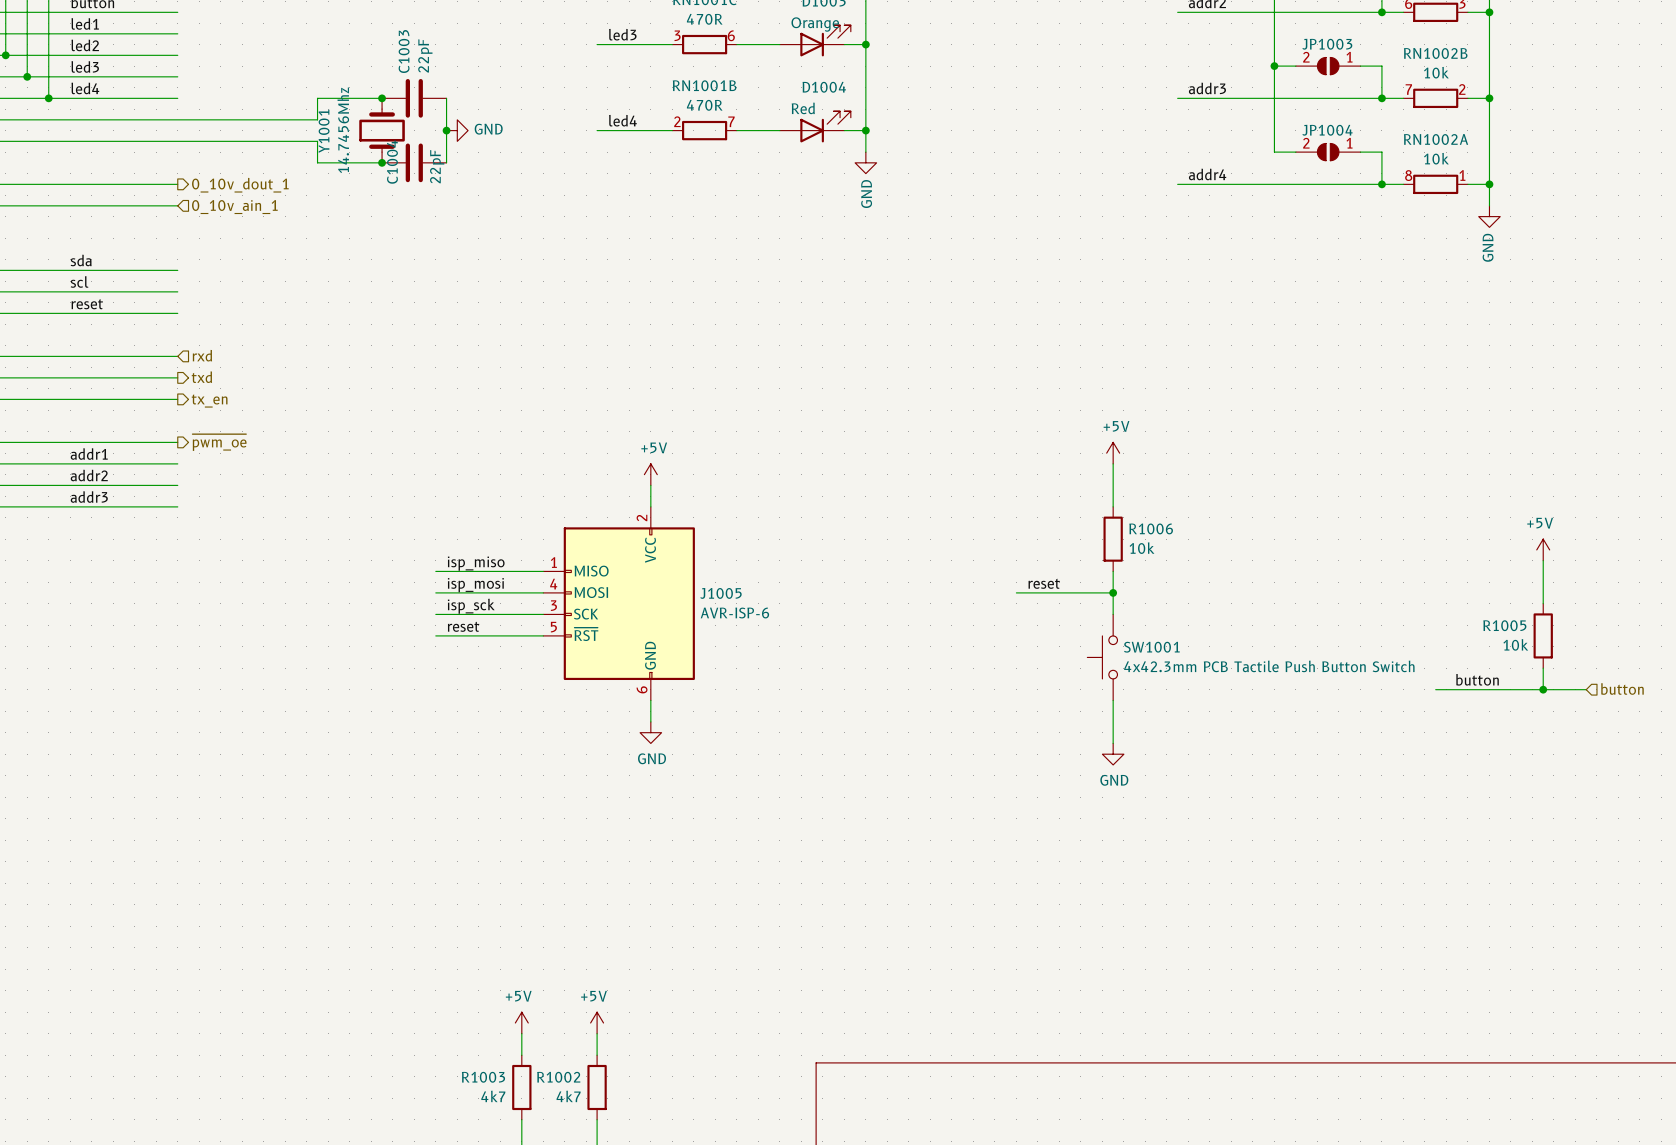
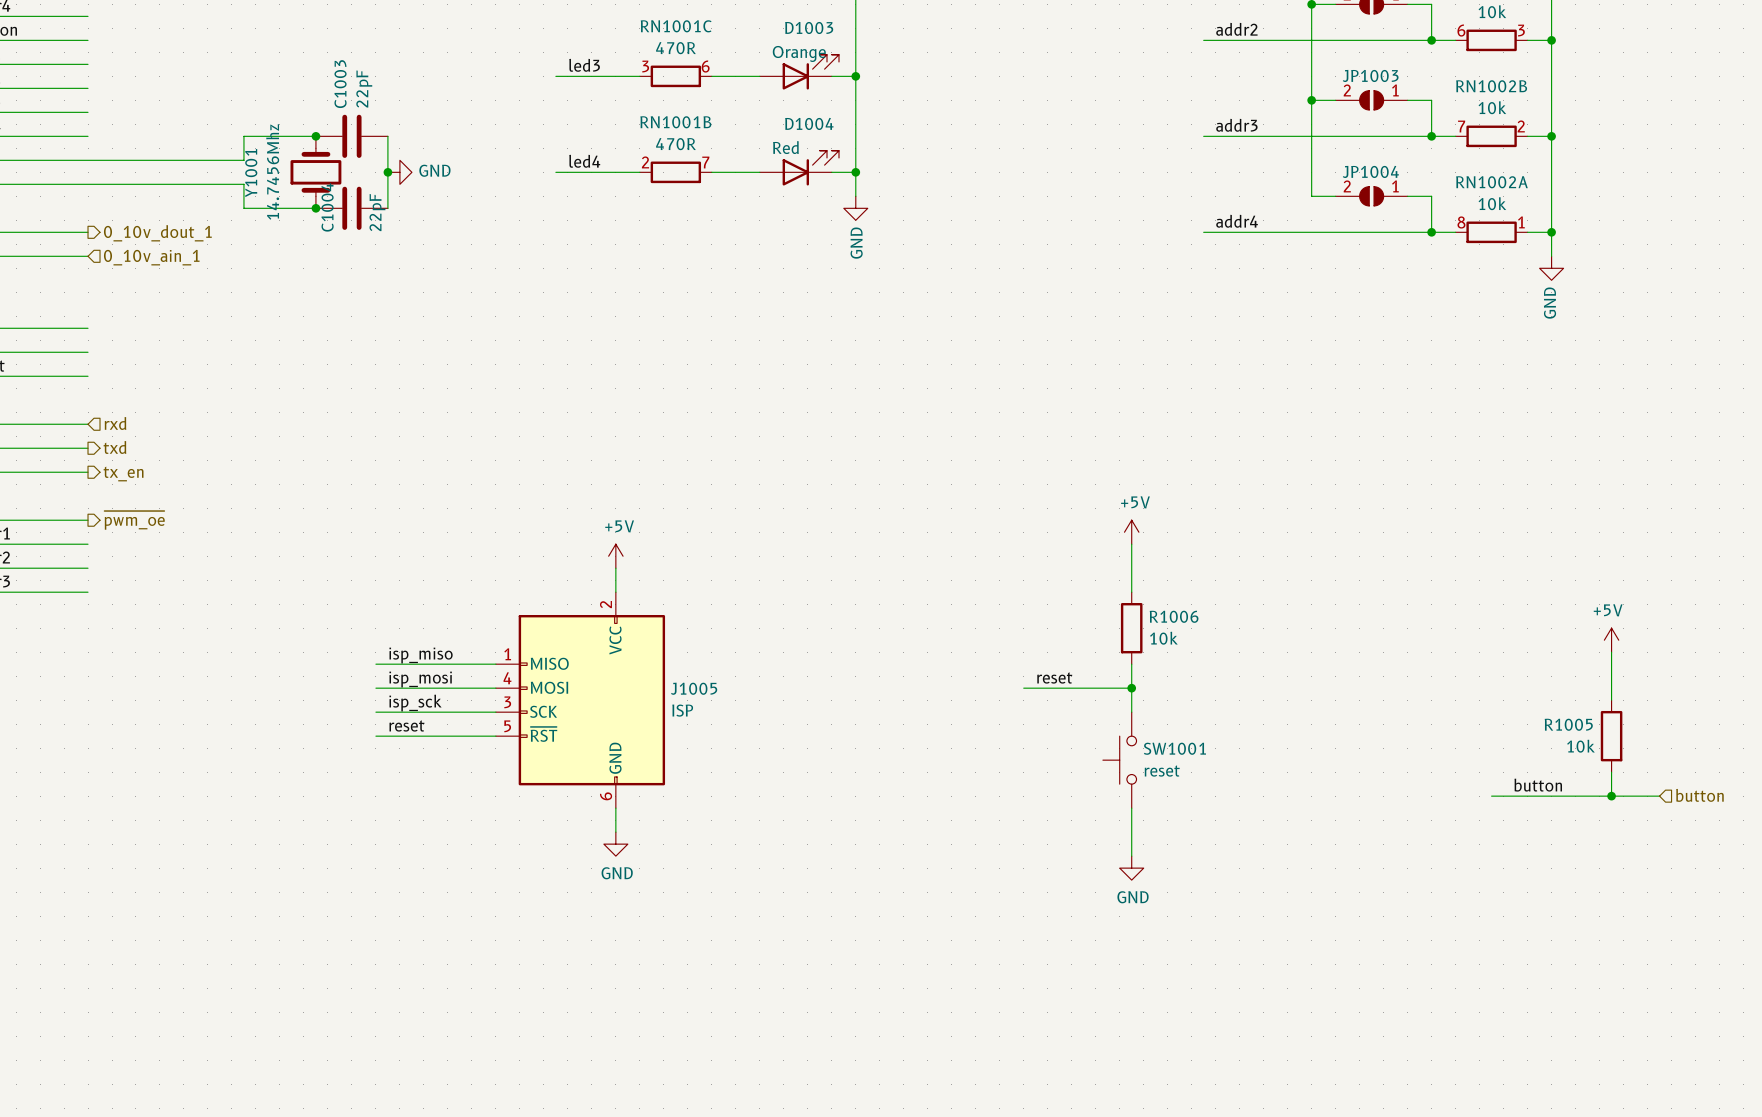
J1005 value: AVR-ISP-6 (734, 613) -> ISP (682, 710)
SW1001 value: 4x42.3mm PCB Tactile Push Button Switch (1269, 666) -> reset (1162, 770)

